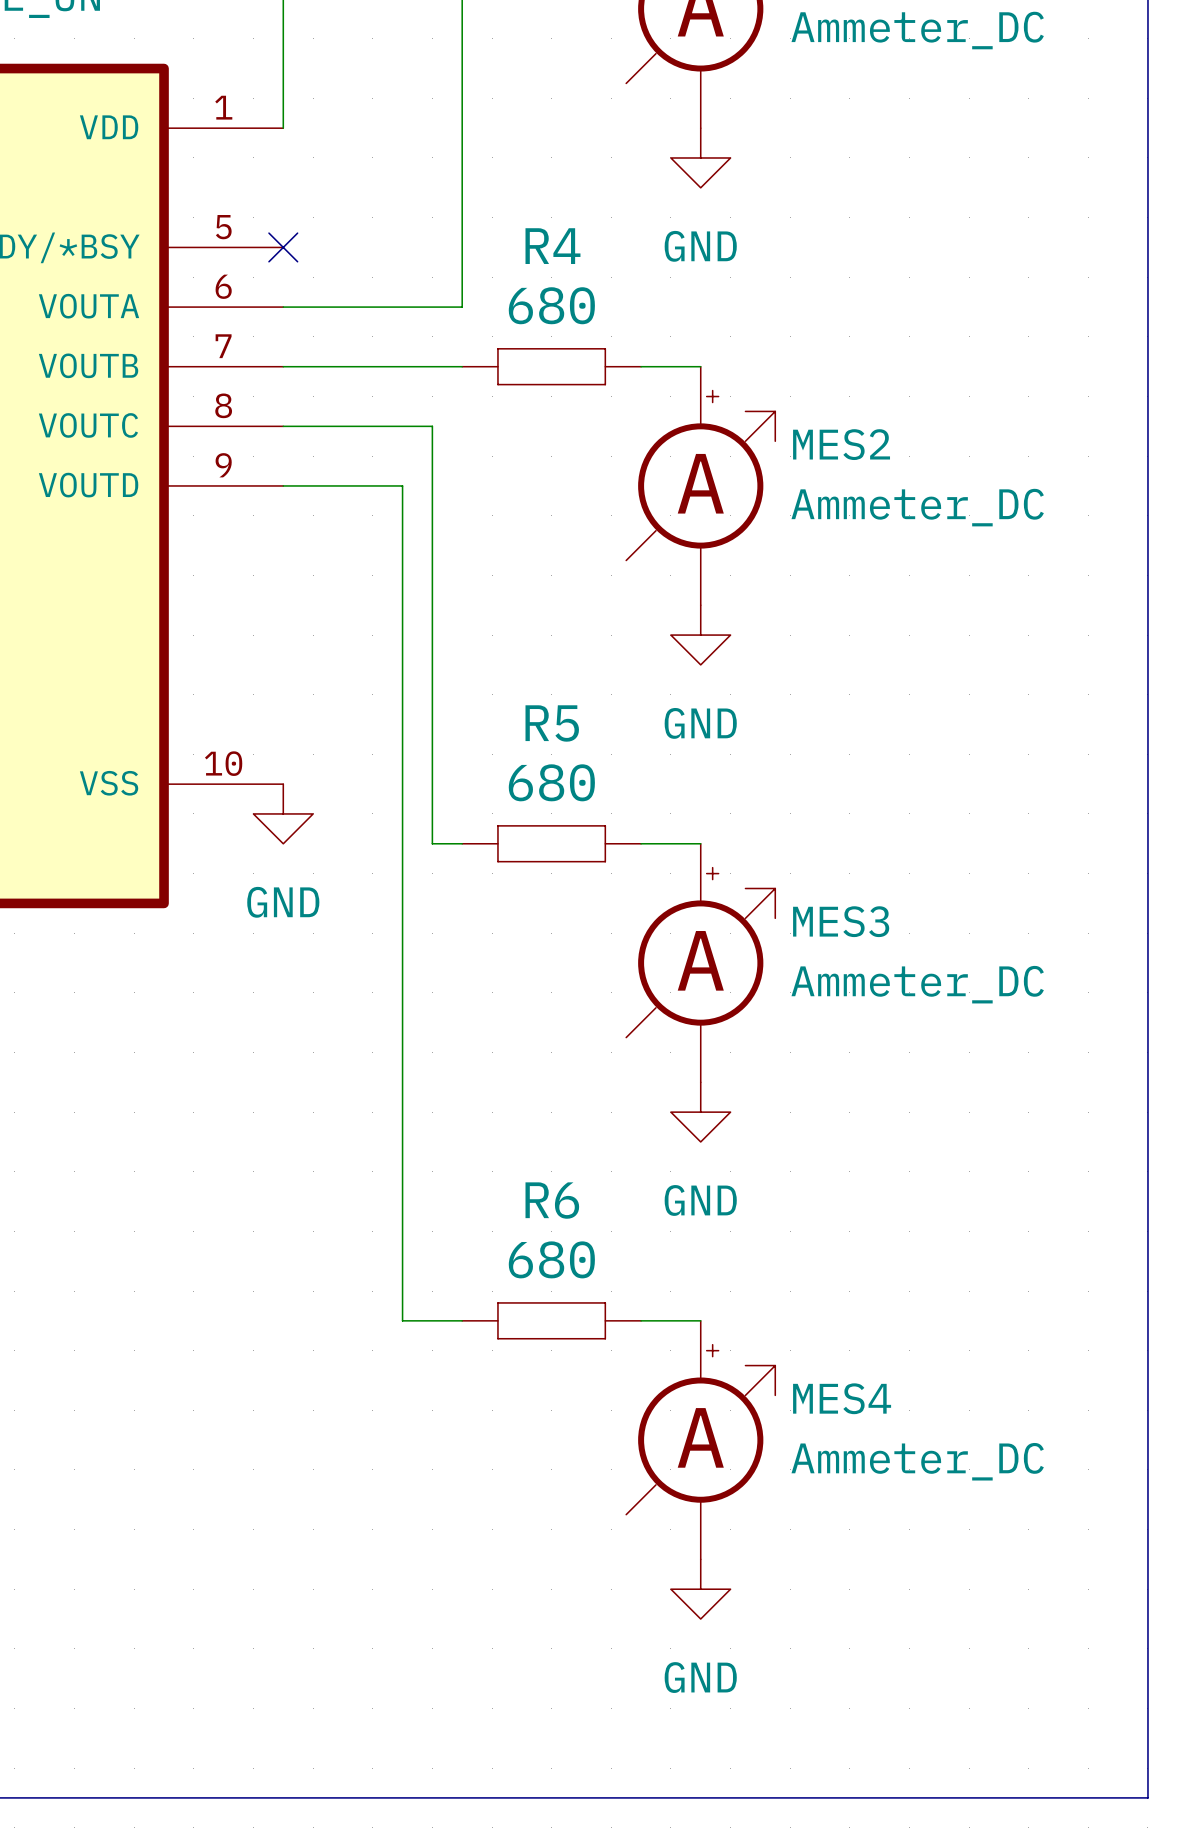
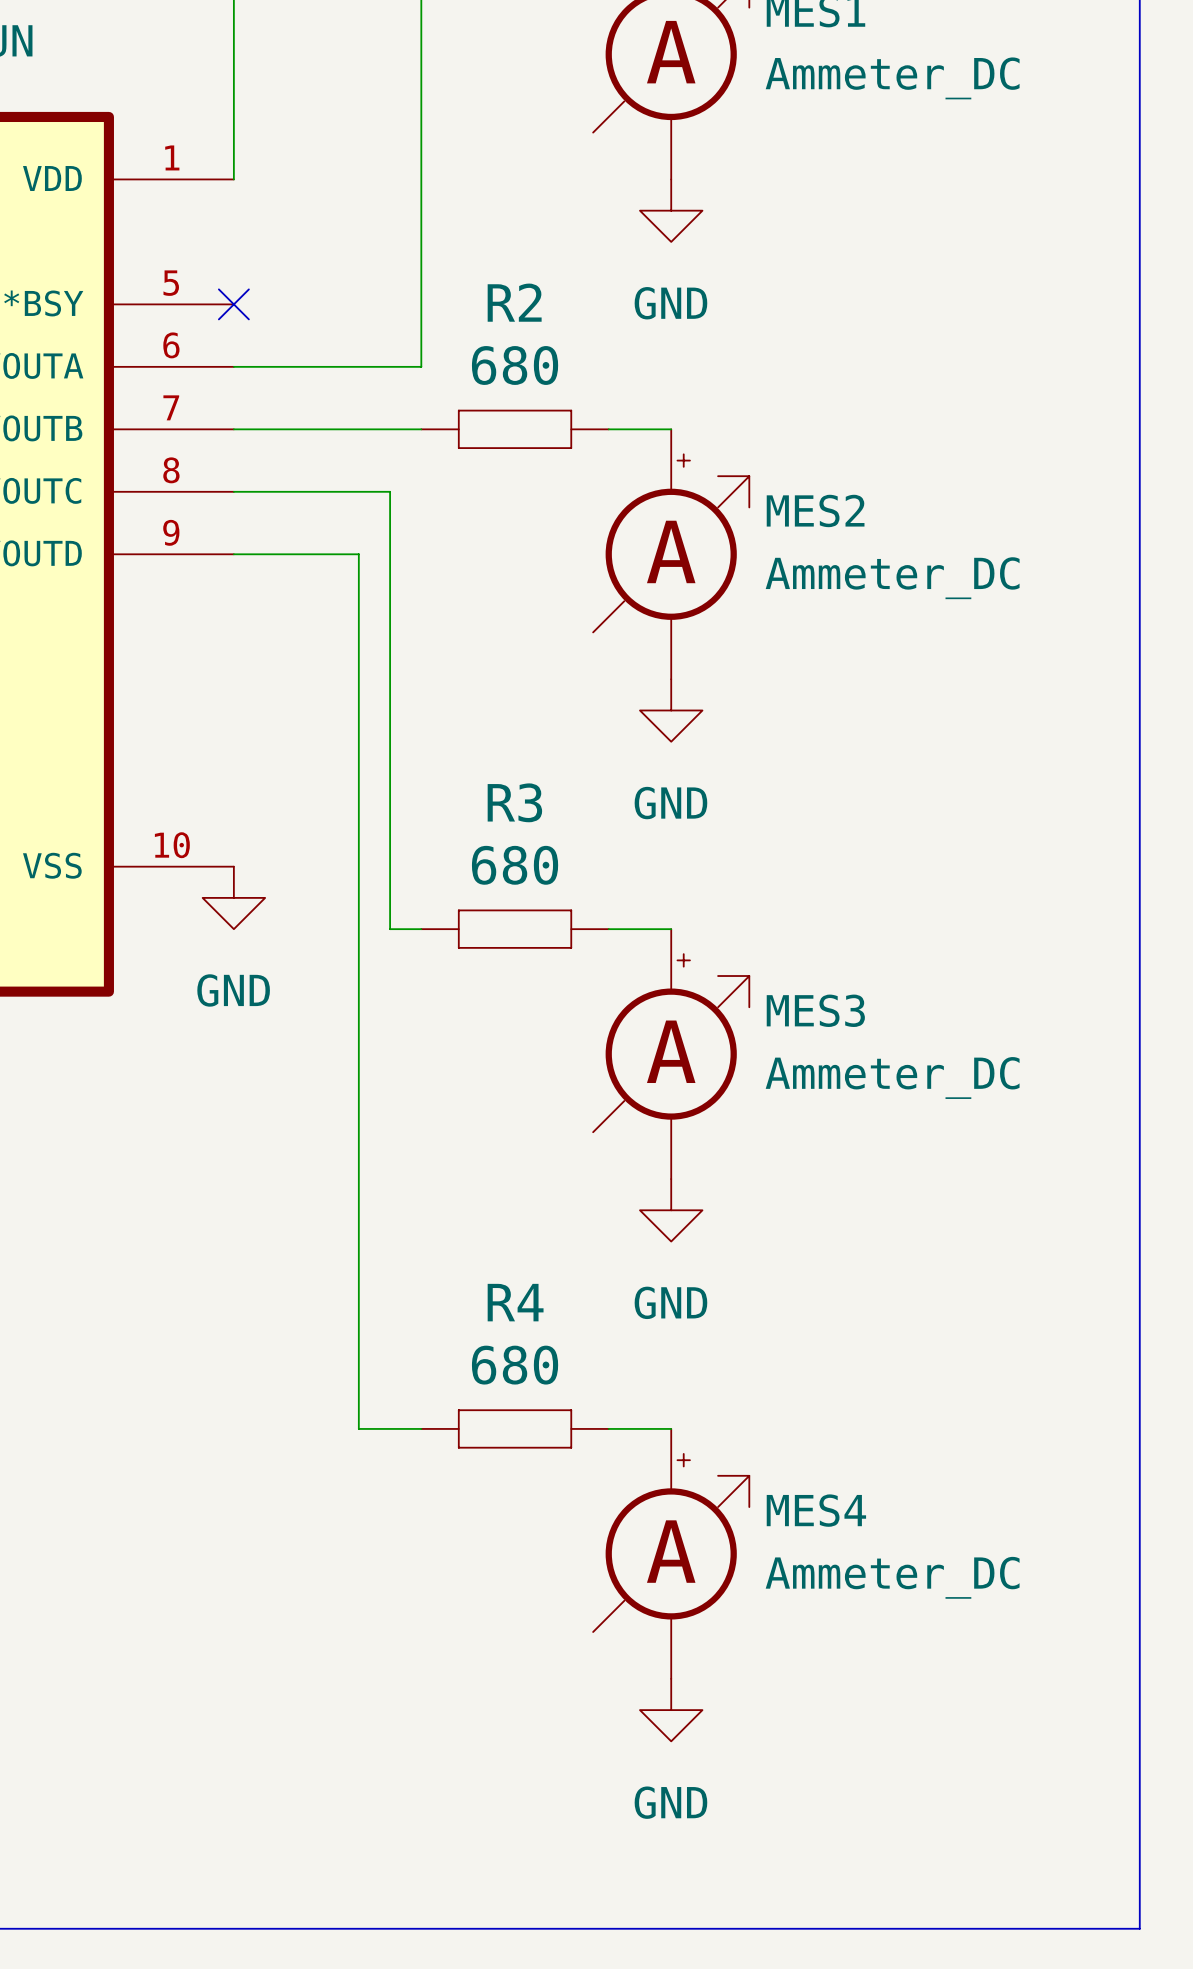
R4 name: R4 (552, 246) -> R2 (514, 302)
R5 name: R5 (552, 723) -> R3 (514, 802)
R6 name: R6 (552, 1200) -> R4 (515, 1302)

